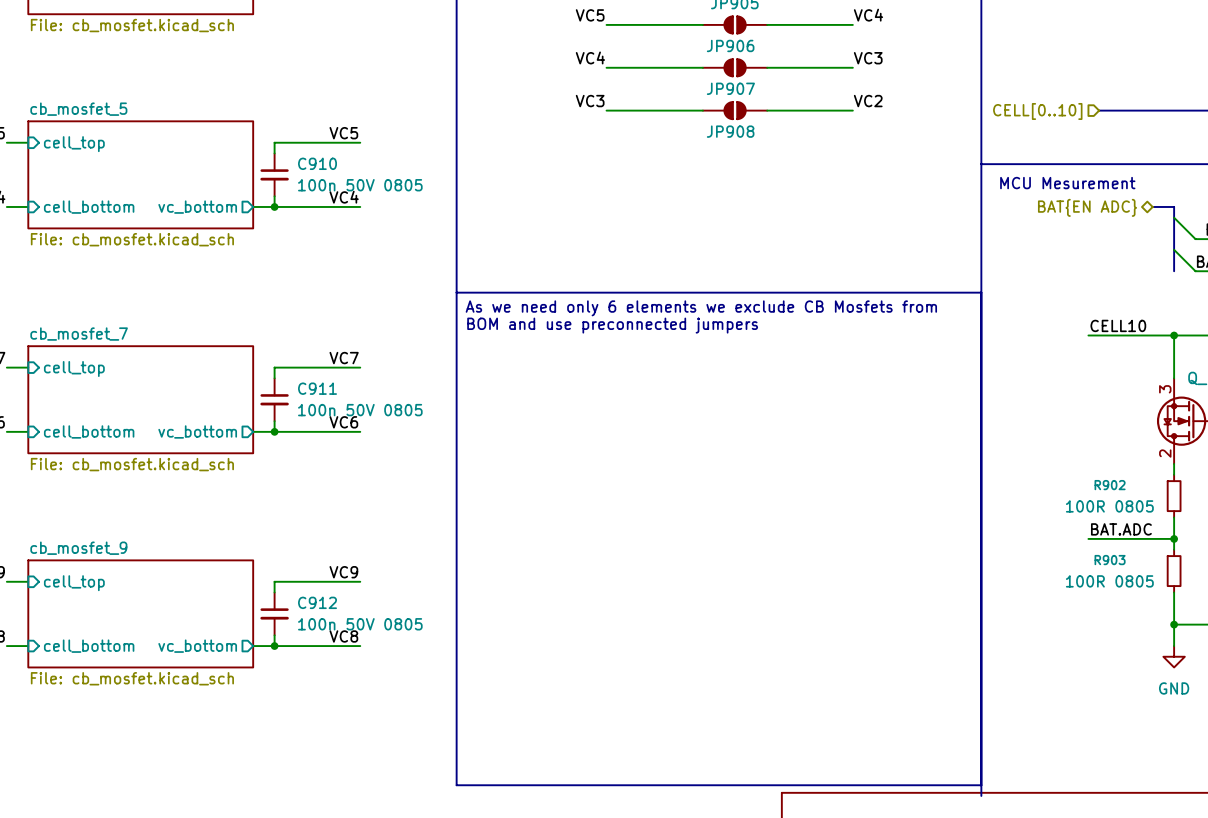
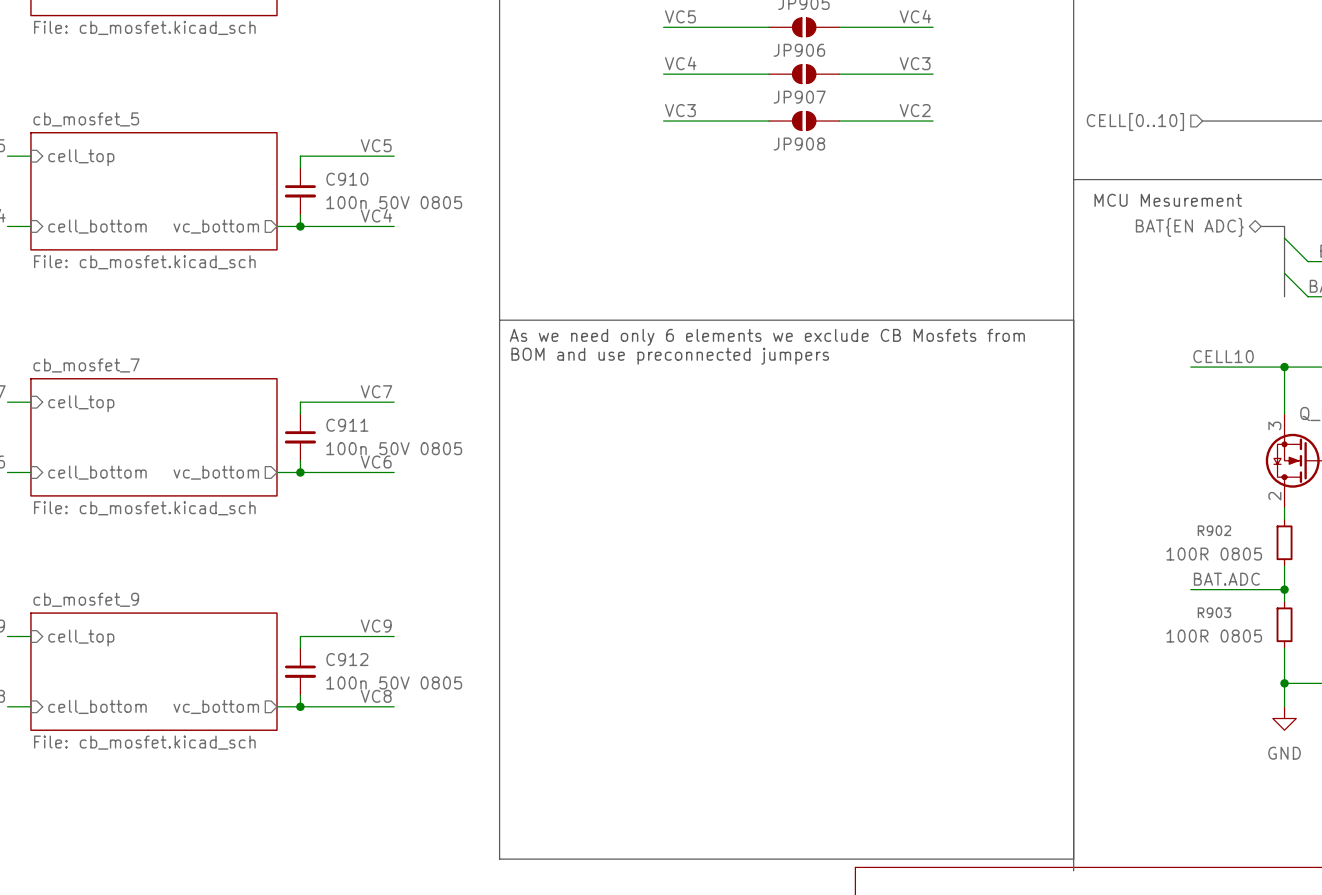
label position: VC5 (590, 15) -> VC5 (680, 16)
label position: VC4 (868, 15) -> VC4 (915, 16)
label position: VC4 (590, 57) -> VC4 (680, 63)
label position: VC3 (868, 58) -> VC3 (915, 63)
label position: VC3 (590, 101) -> VC3 (680, 110)
label position: VC2 (868, 101) -> VC2 (915, 110)

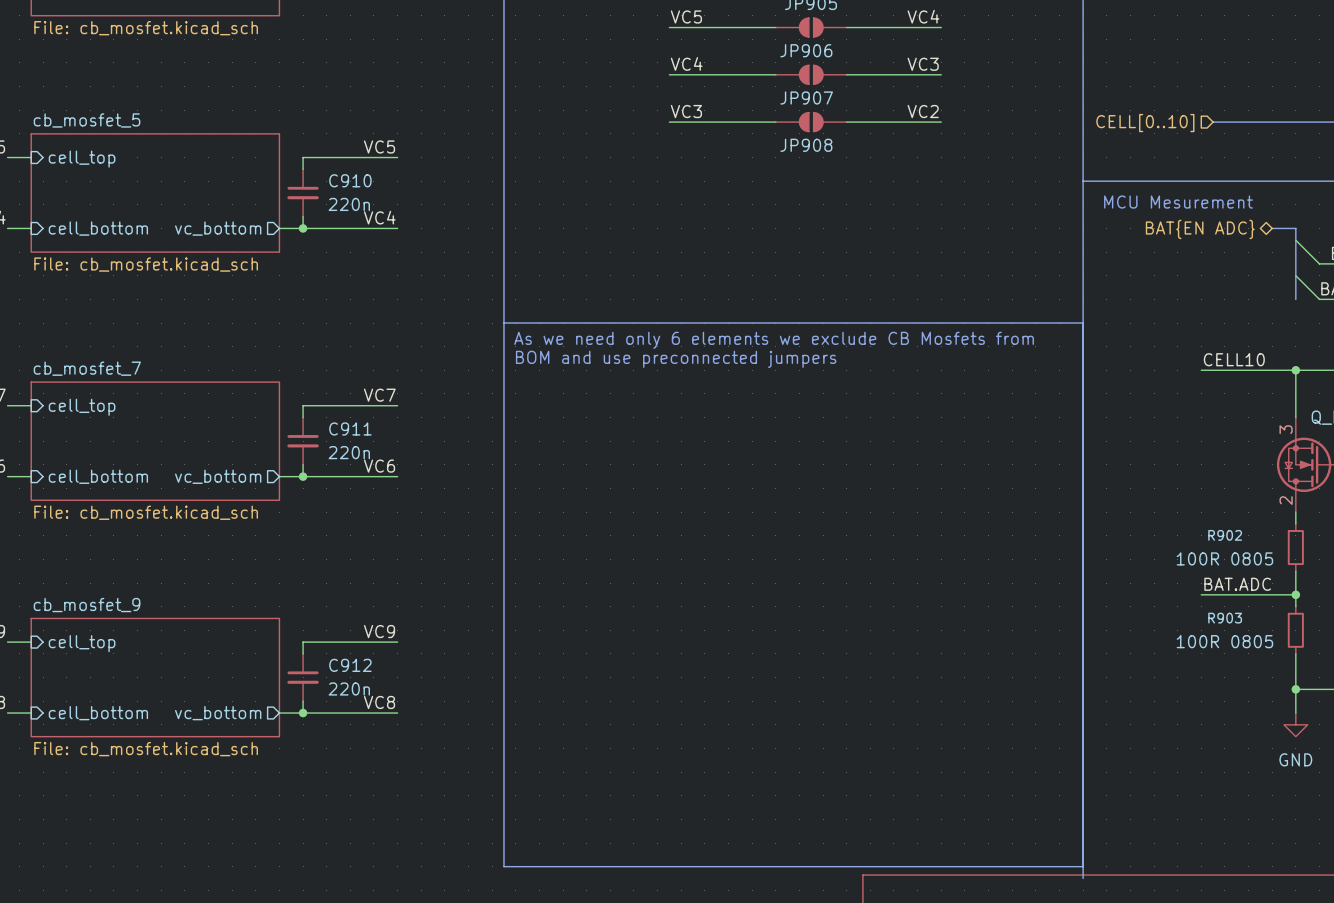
C910 value: 100n 50V 0805 (394, 202) -> 220n (349, 204)
C911 value: 100n 50V 0805 (394, 448) -> 220n (349, 452)
C912 value: 100n 50V 0805 (394, 682) -> 220n (349, 688)

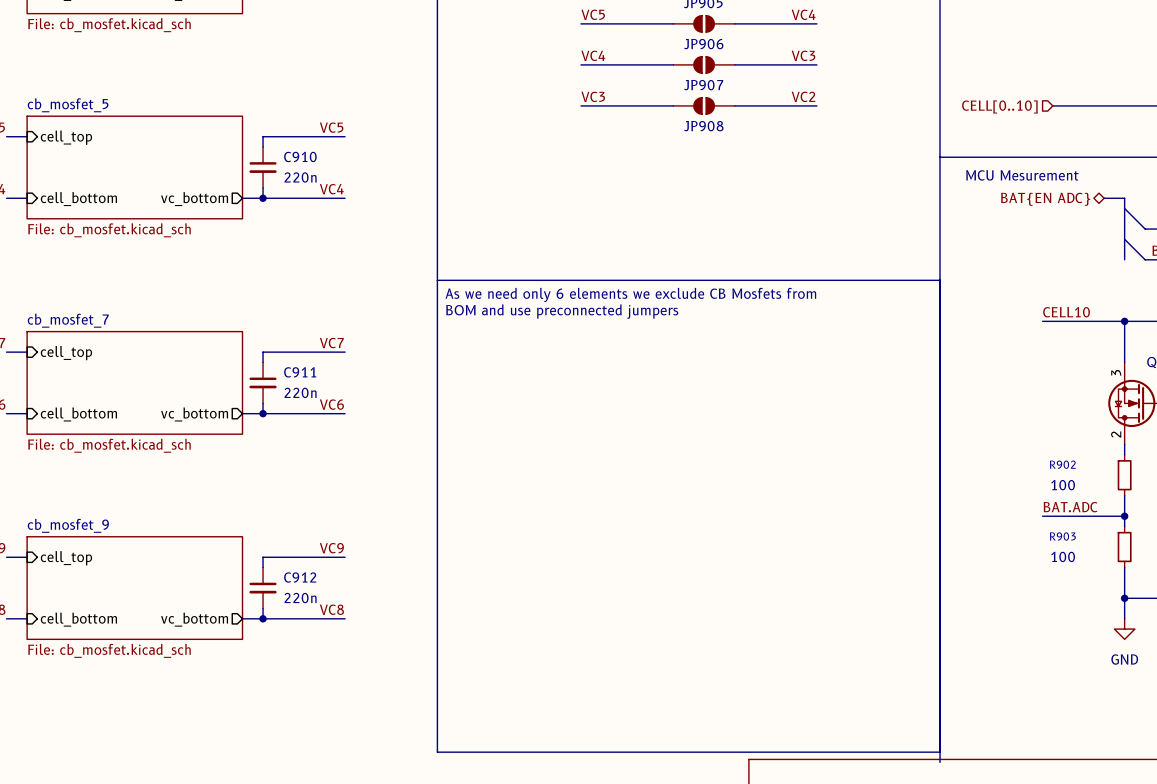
R902 value: 100R 0805 (1224, 558) -> 100 (1063, 485)
R903 value: 100R 0805 (1224, 641) -> 100 (1063, 556)

